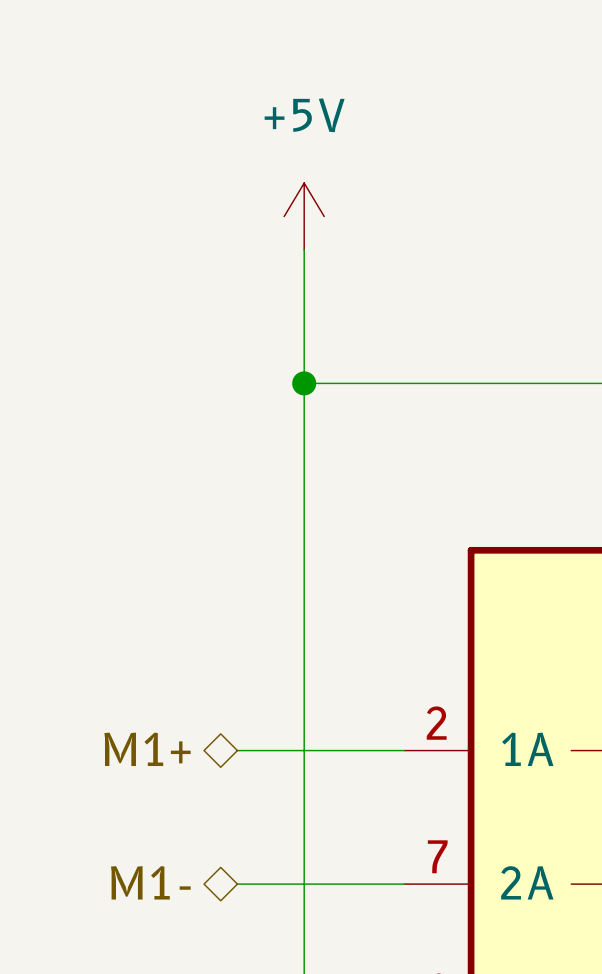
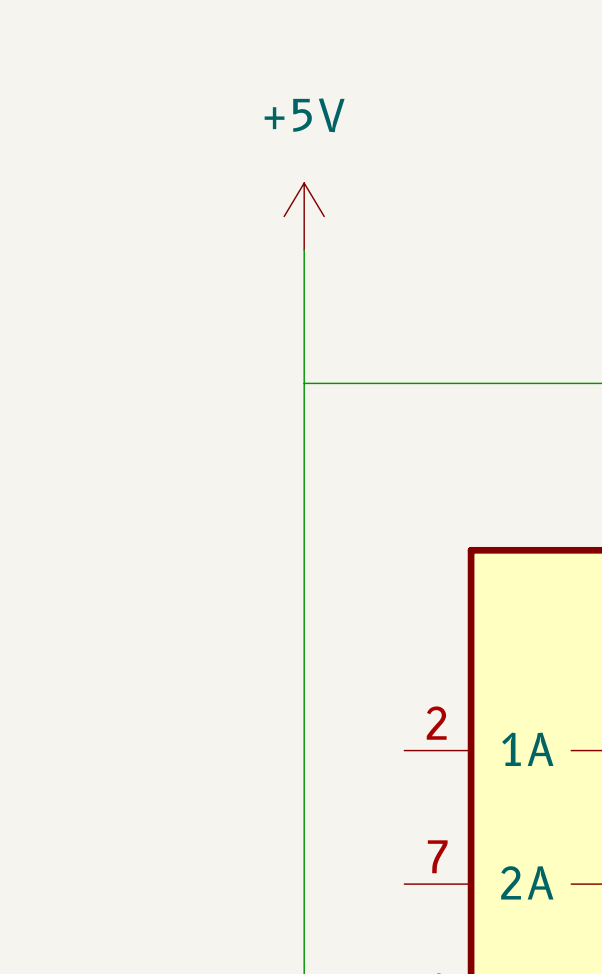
junction: (304, 383) -> none
hierarchical label: M1+ (147, 749) -> none
wire: (237, 750) (404, 750) -> none
hierarchical label: M1- (150, 882) -> none
wire: (237, 884) (404, 884) -> none

